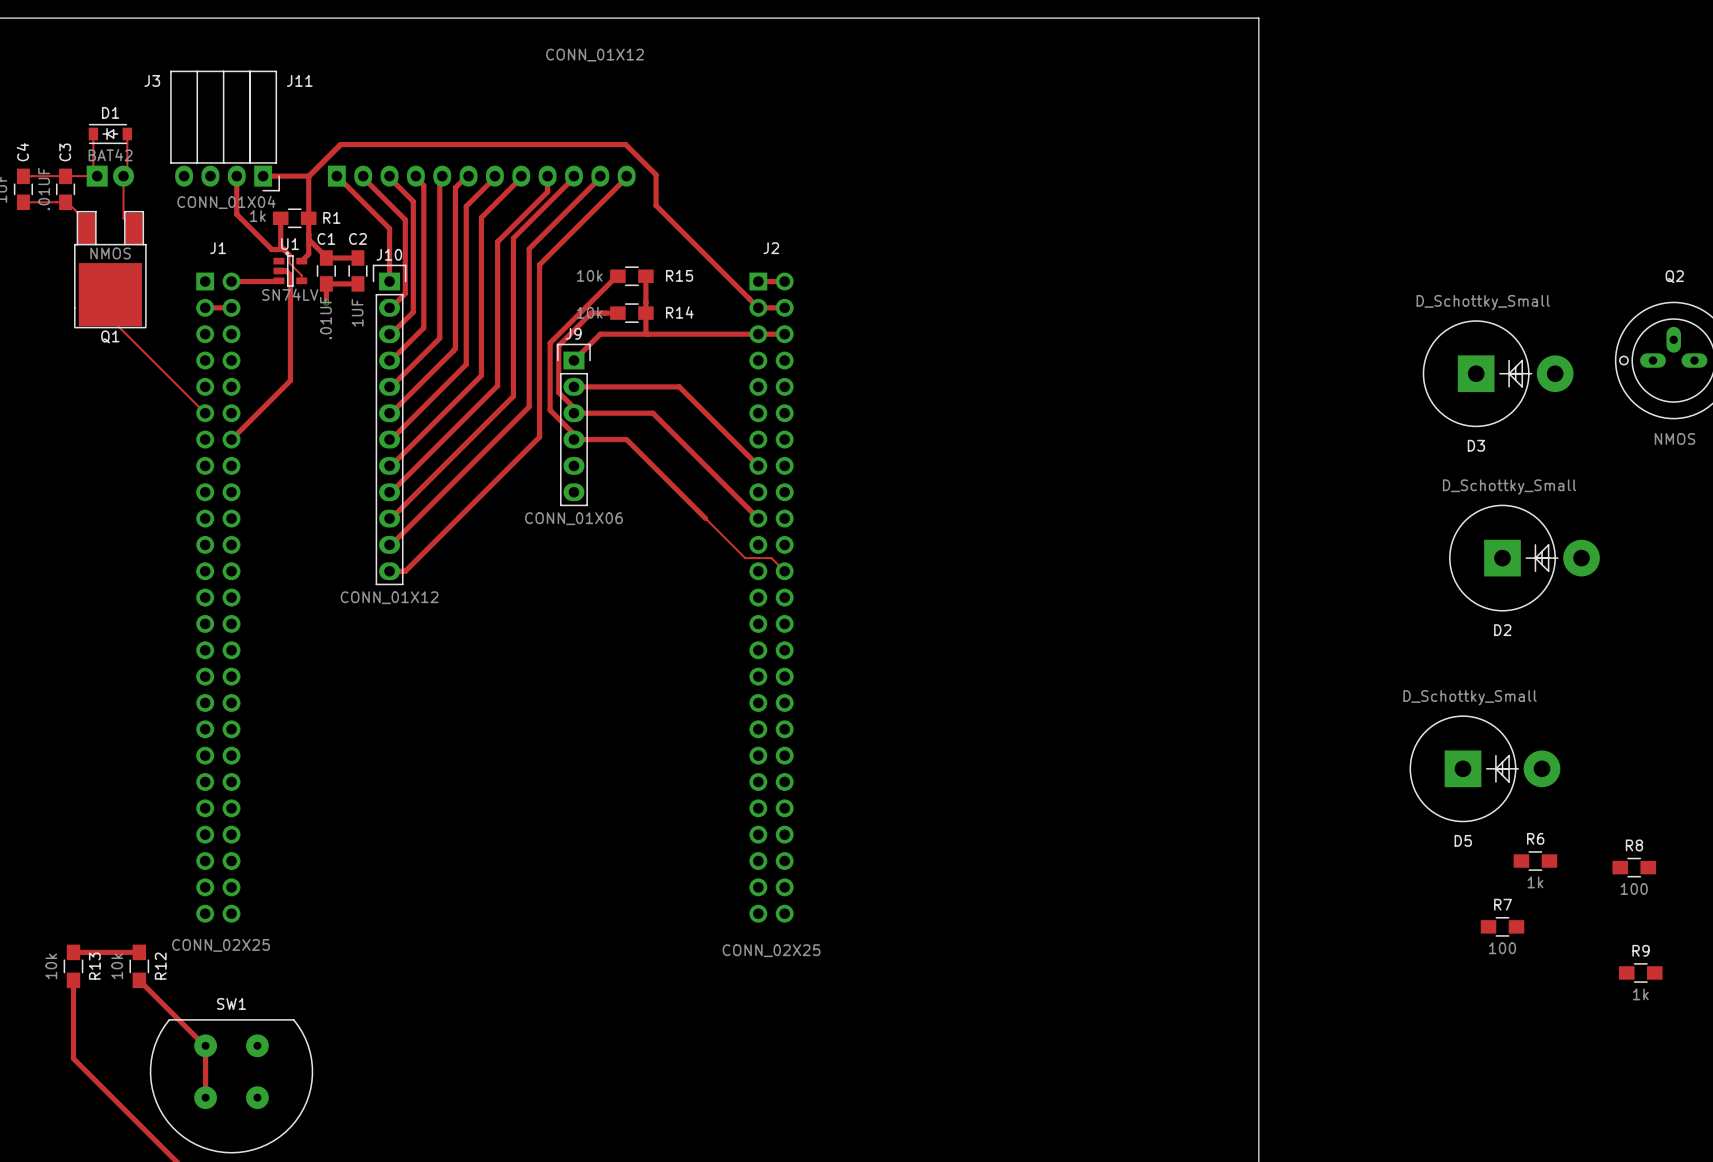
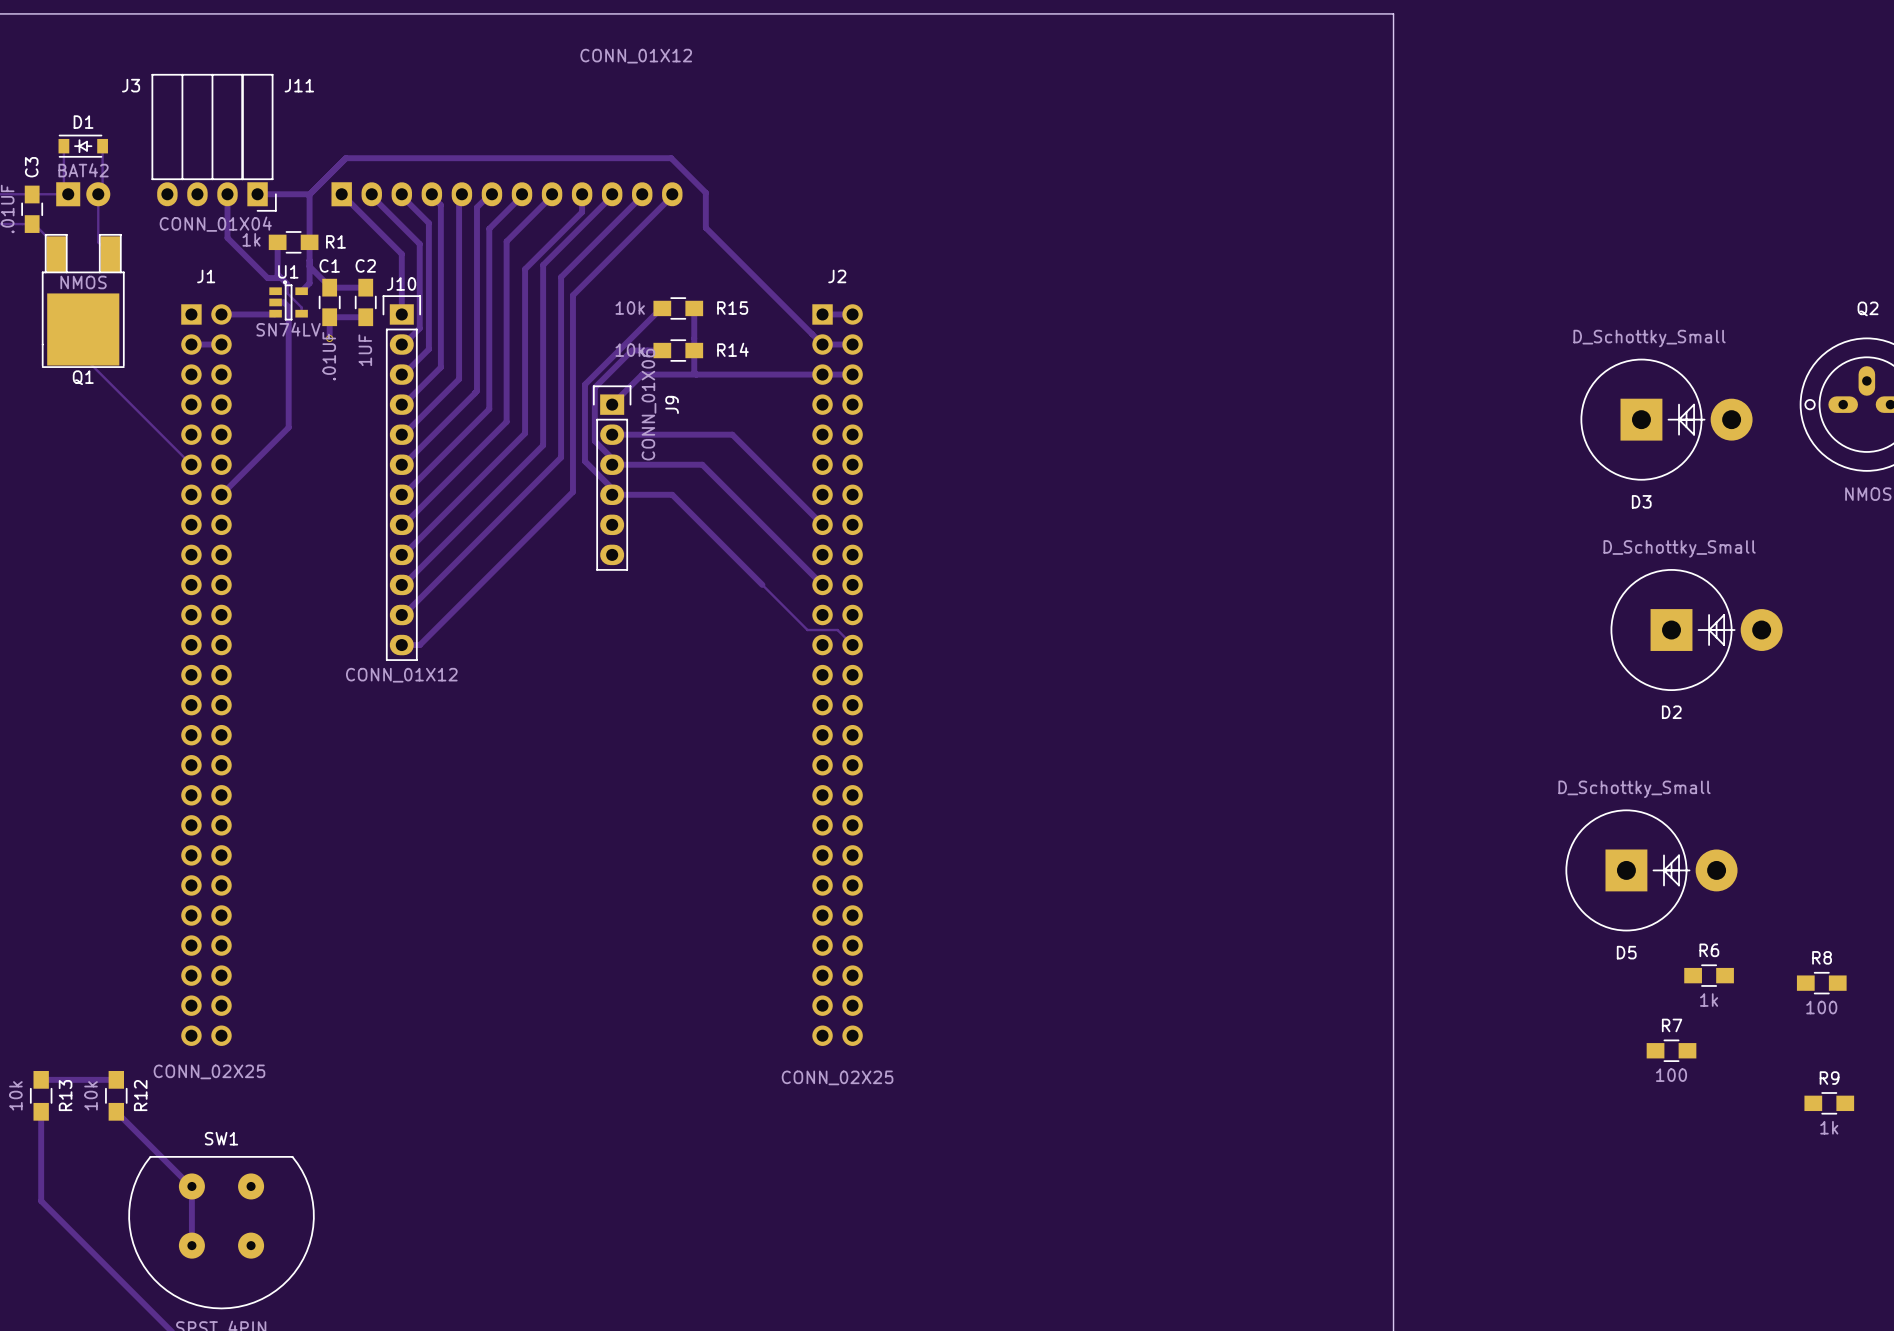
J9 name rotation: 0° (573, 333) -> 90° counterclockwise (672, 404)
J9 name position: J9 (573, 333) -> J9 (672, 404)
J9 value rotation: 0° (573, 518) -> 90° counterclockwise (648, 404)
J9 value position: CONN_01X06 (573, 518) -> CONN_01X06 (648, 404)

